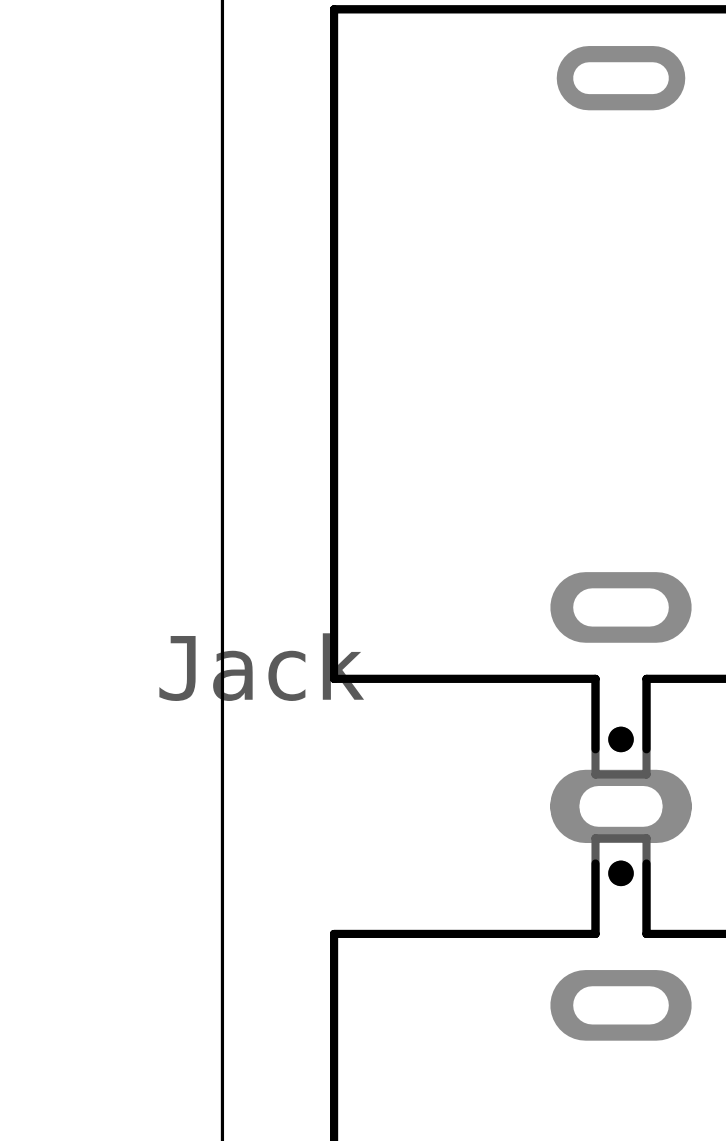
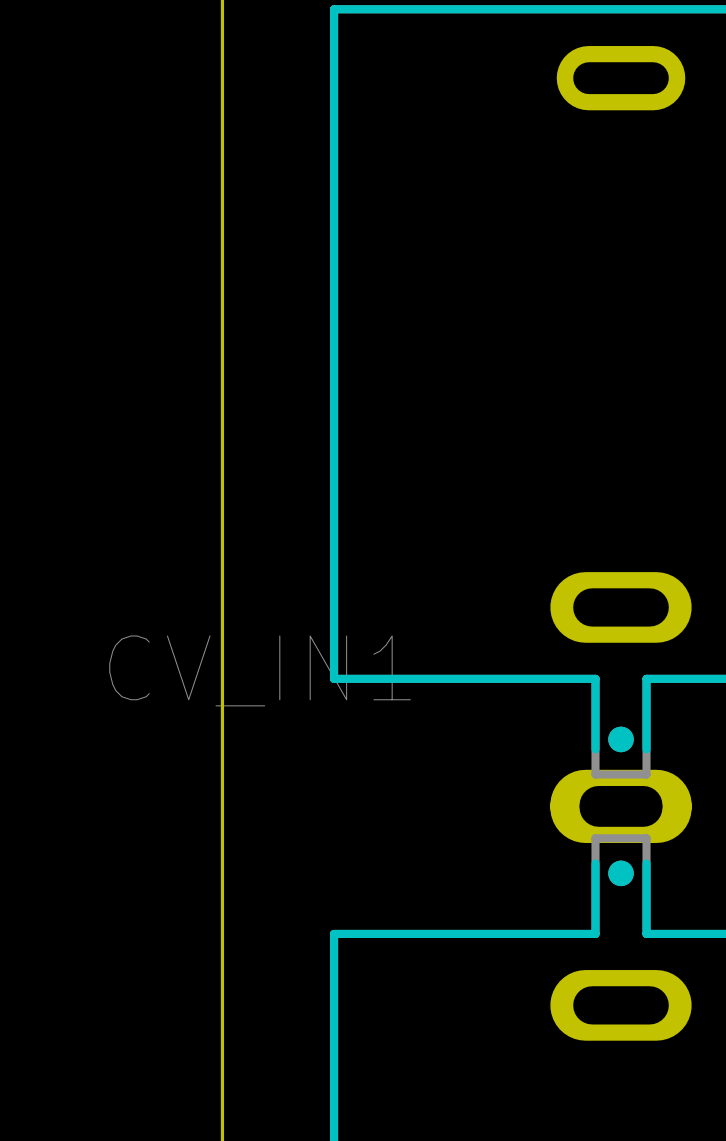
part value: Jack (261, 667) -> CV_IN1 (260, 670)

